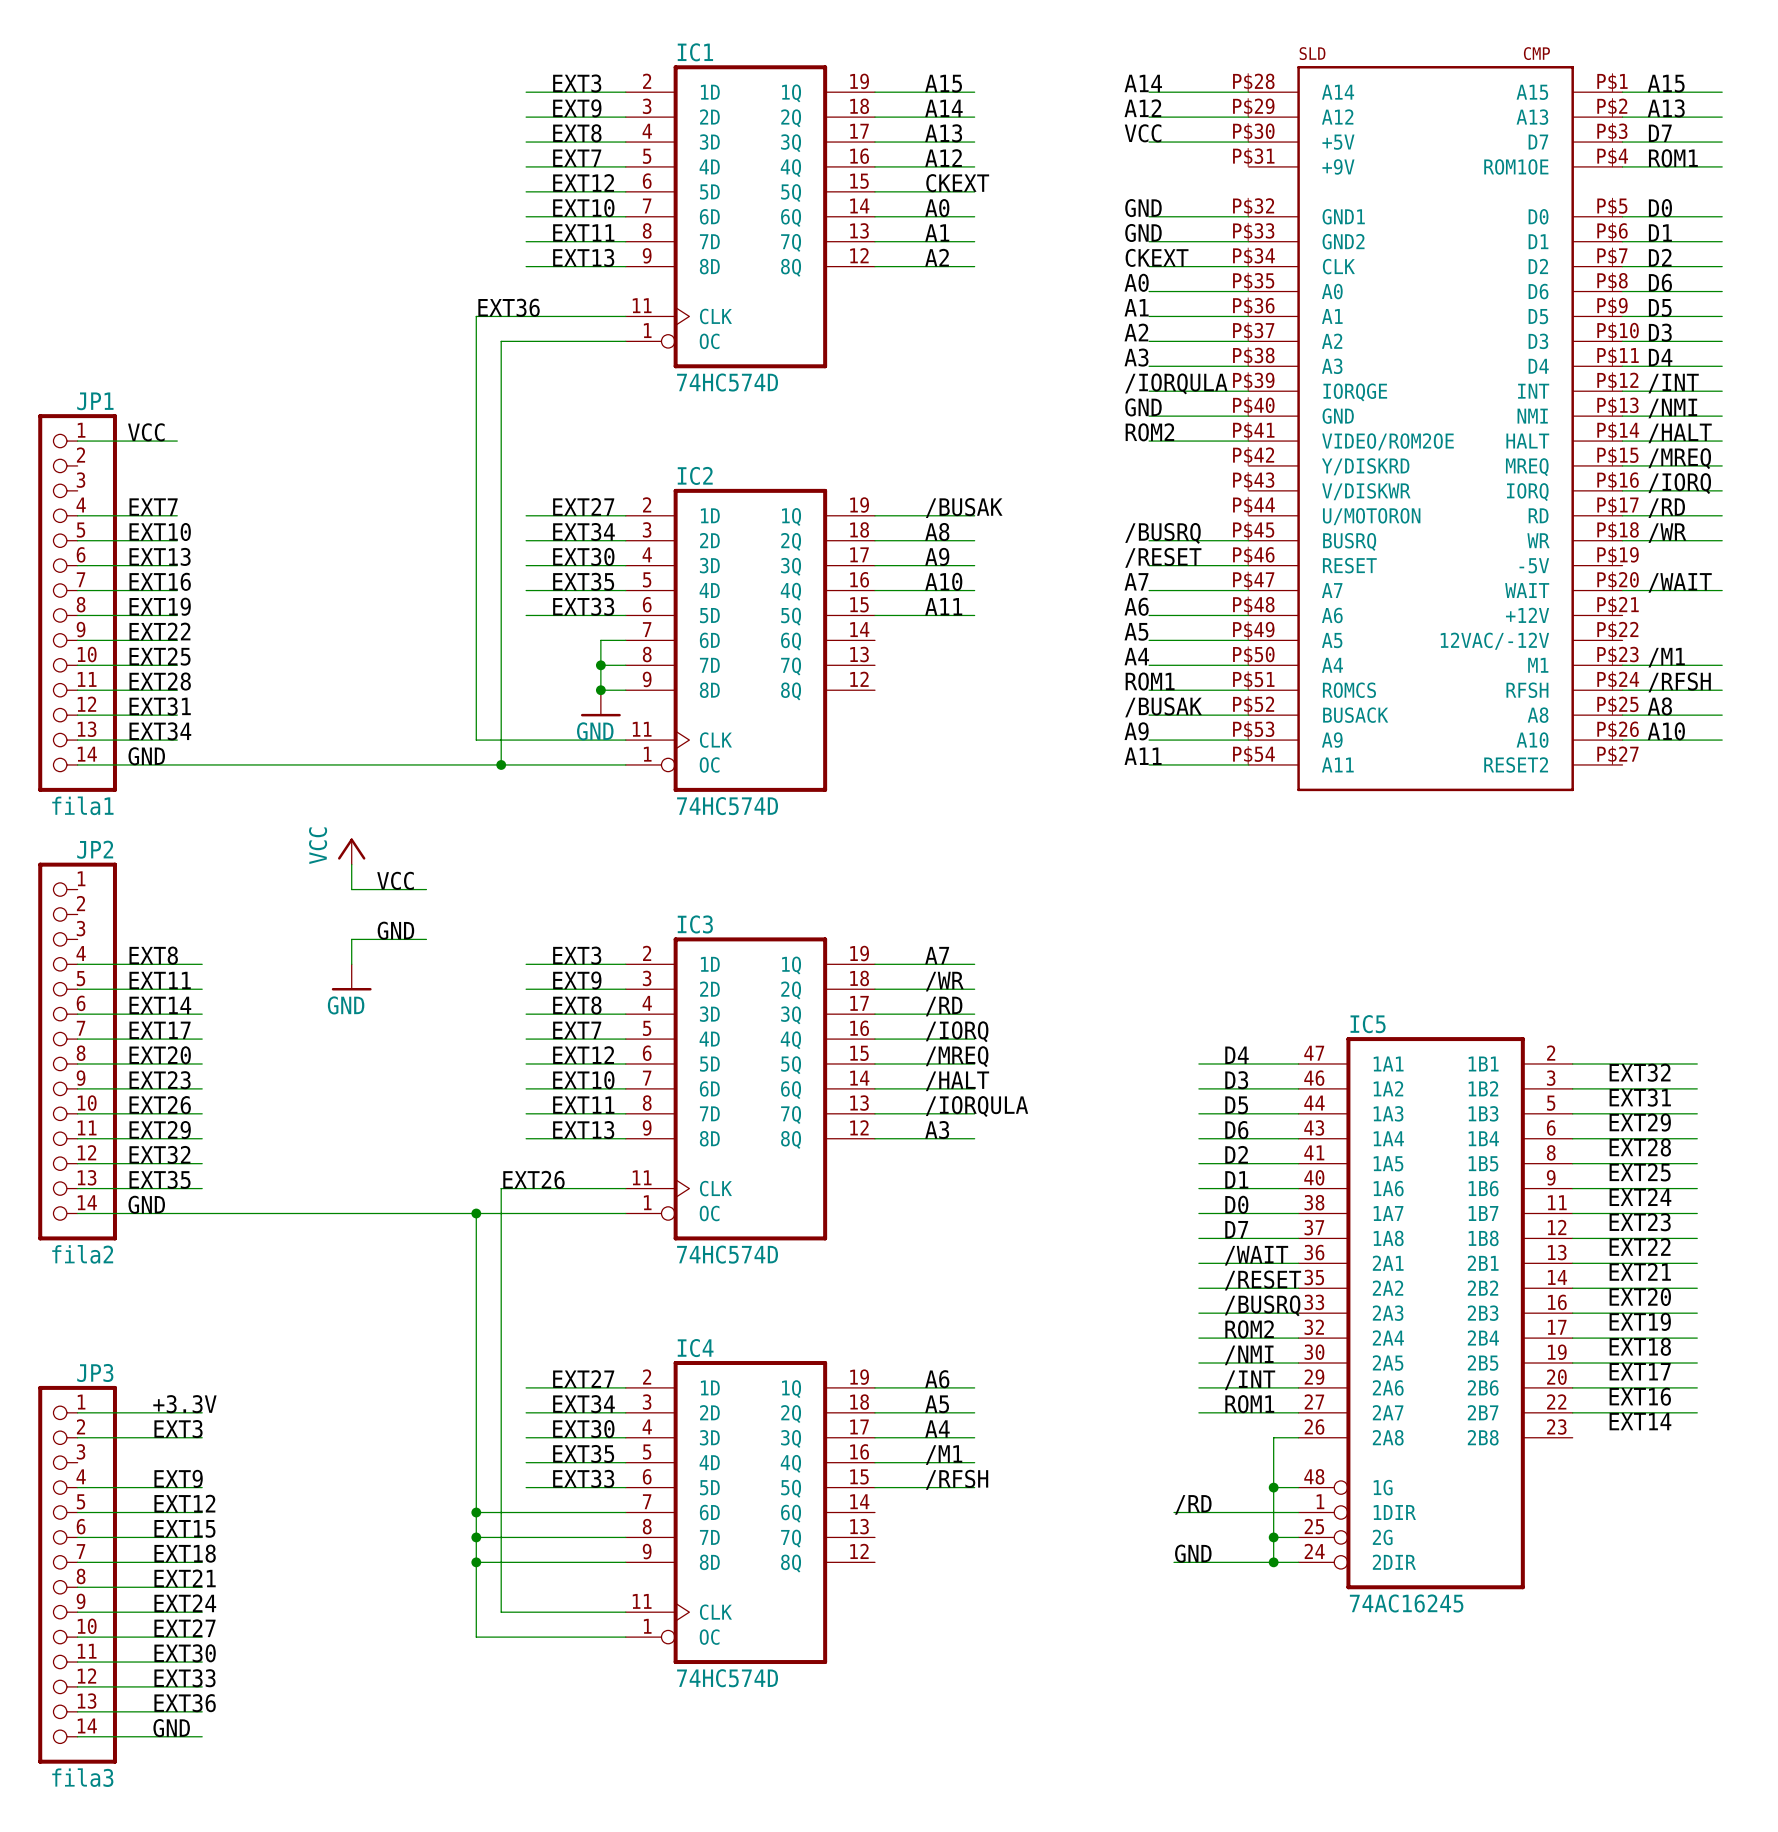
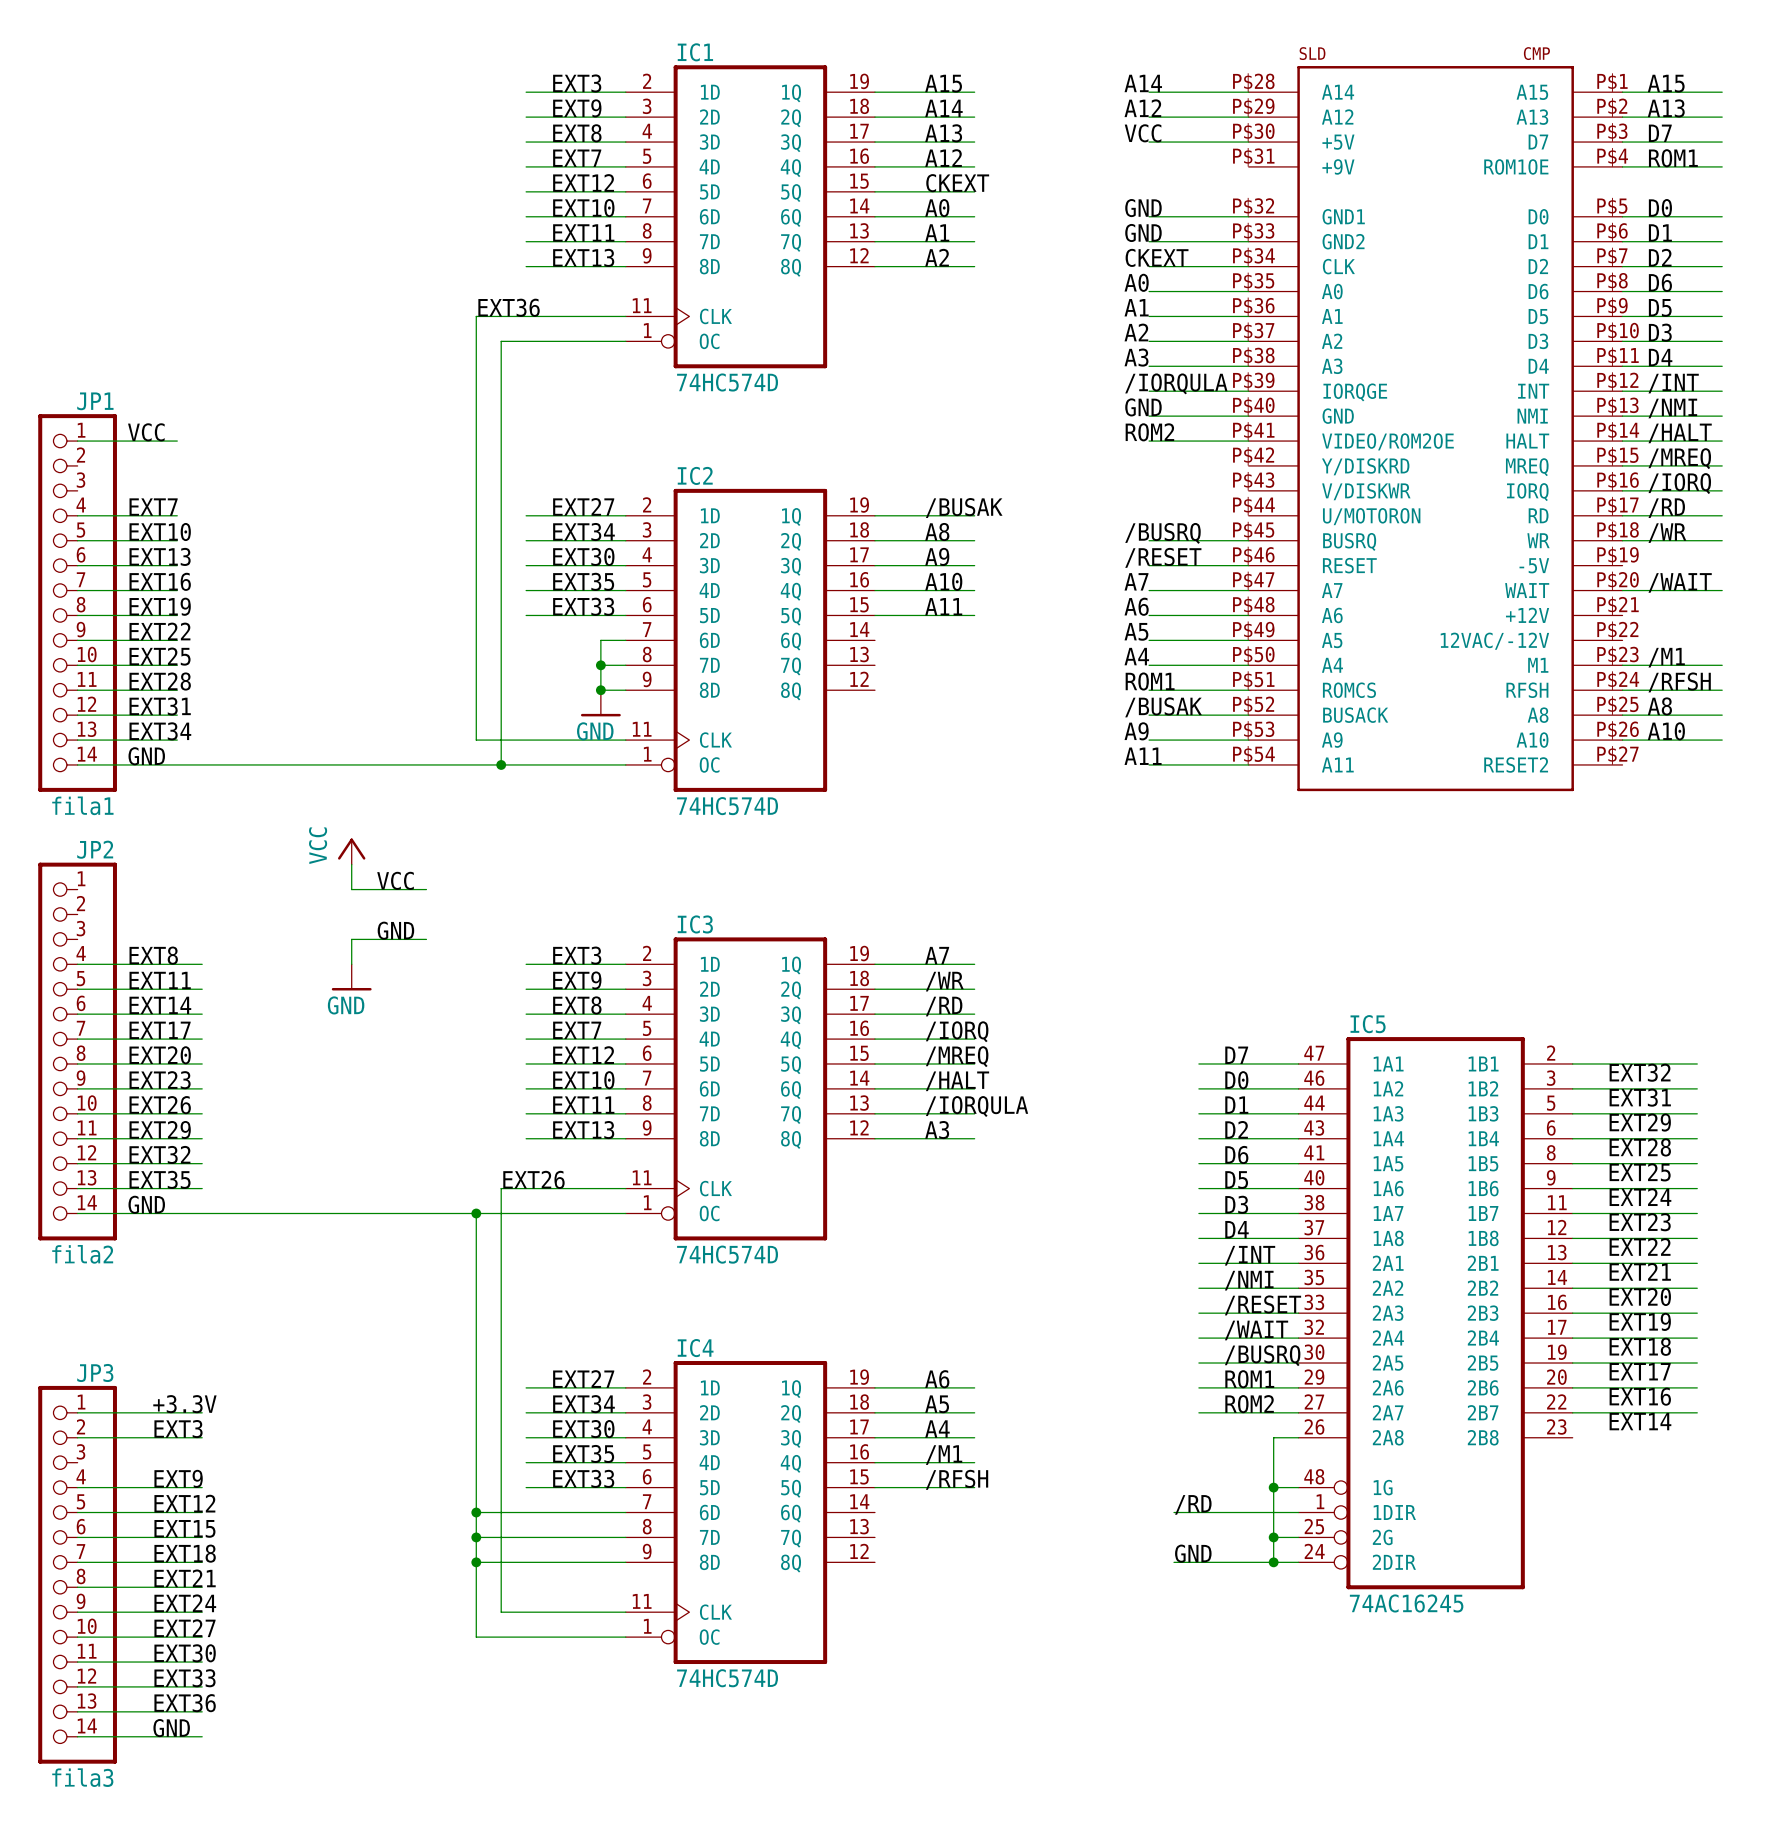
label: D4 (1237, 1055) -> D7 (1236, 1055)
label: D3 (1236, 1080) -> D0 (1236, 1080)
label: D5 (1236, 1105) -> D1 (1236, 1105)
label: D6 (1236, 1130) -> D2 (1236, 1129)
label: D2 (1236, 1154) -> D6 (1236, 1154)
label: D1 (1236, 1179) -> D5 (1236, 1180)
label: D0 (1236, 1204) -> D3 (1236, 1204)
label: D7 (1236, 1229) -> D4 (1237, 1229)
label: /WAIT (1256, 1255) -> /INT (1250, 1255)
label: /RESET (1263, 1280) -> /NMI (1249, 1280)
label: /BUSRQ (1262, 1305) -> /RESET (1263, 1305)
label: ROM2 (1249, 1329) -> /WAIT (1256, 1330)
label: /NMI (1249, 1355) -> /BUSRQ (1262, 1355)
label: /INT (1250, 1380) -> ROM1 (1249, 1379)
label: ROM1 (1249, 1404) -> ROM2 (1249, 1404)

